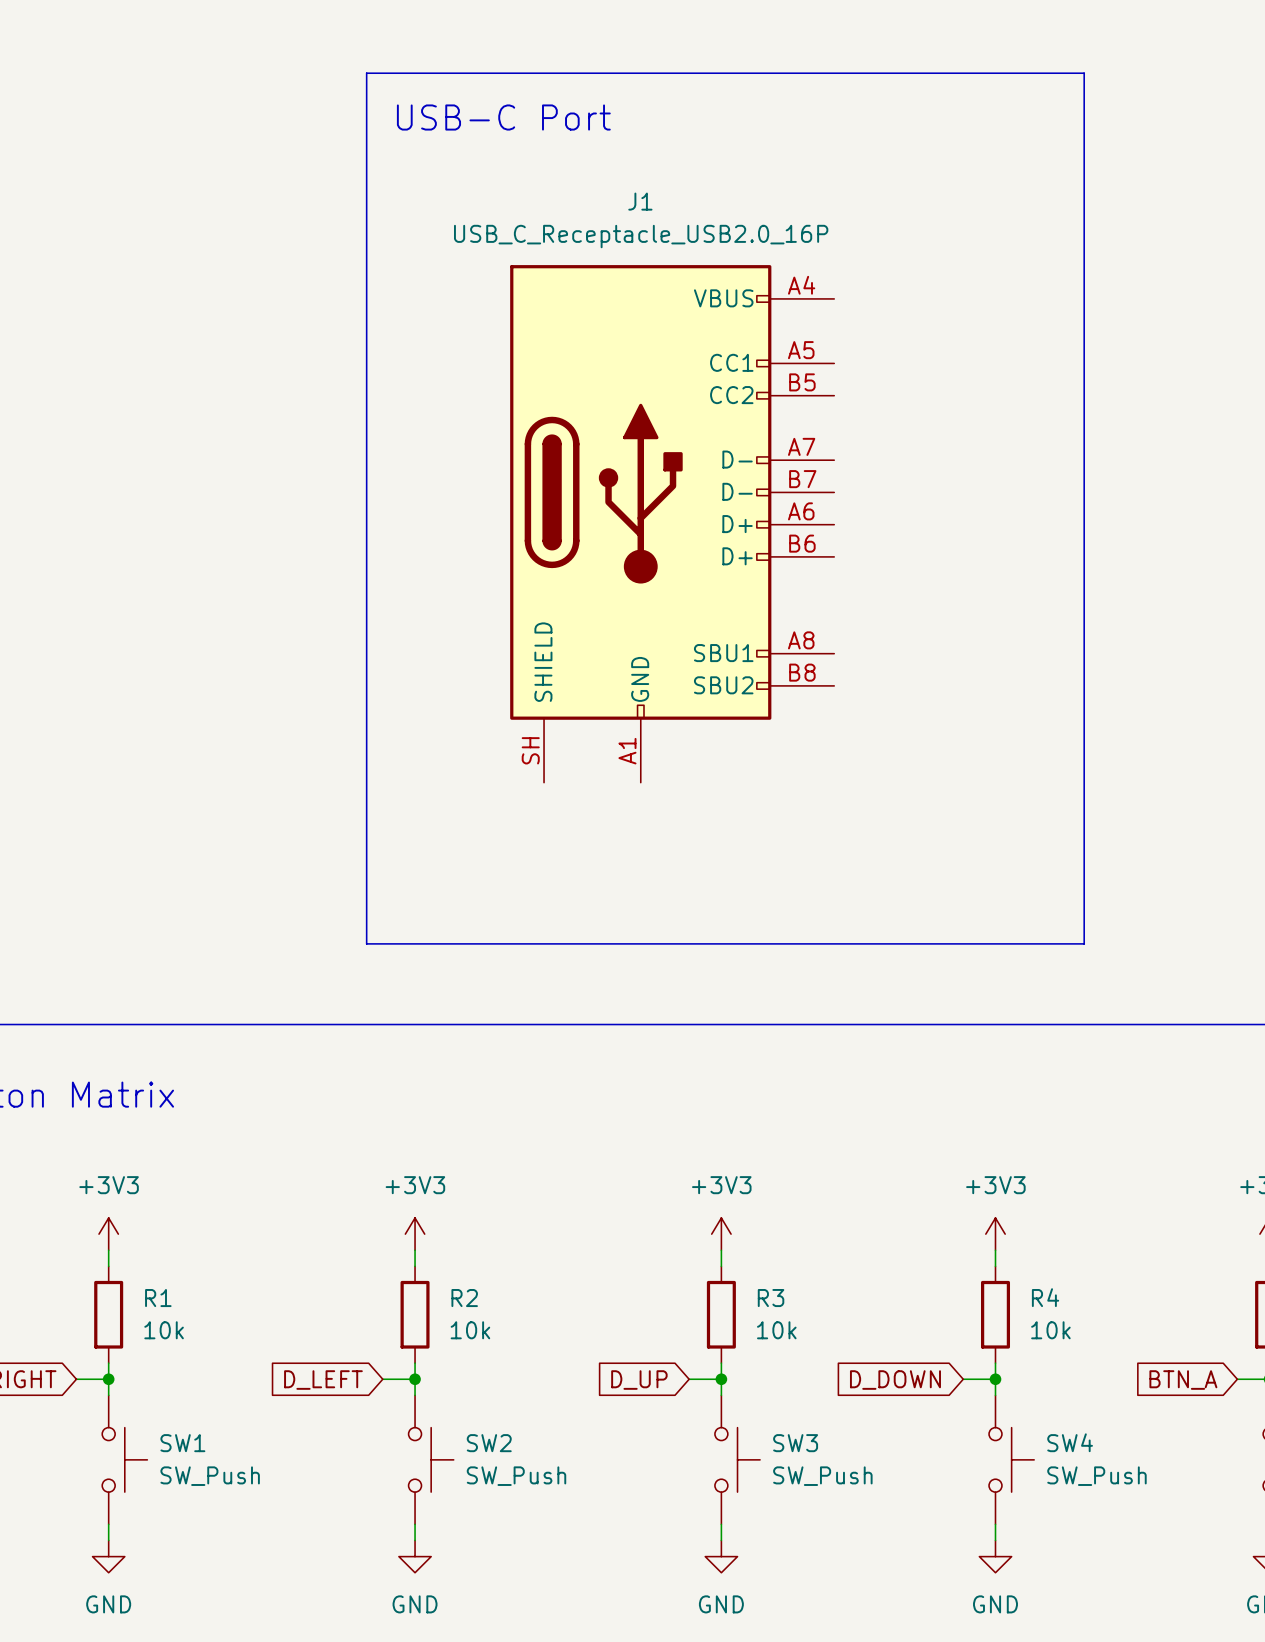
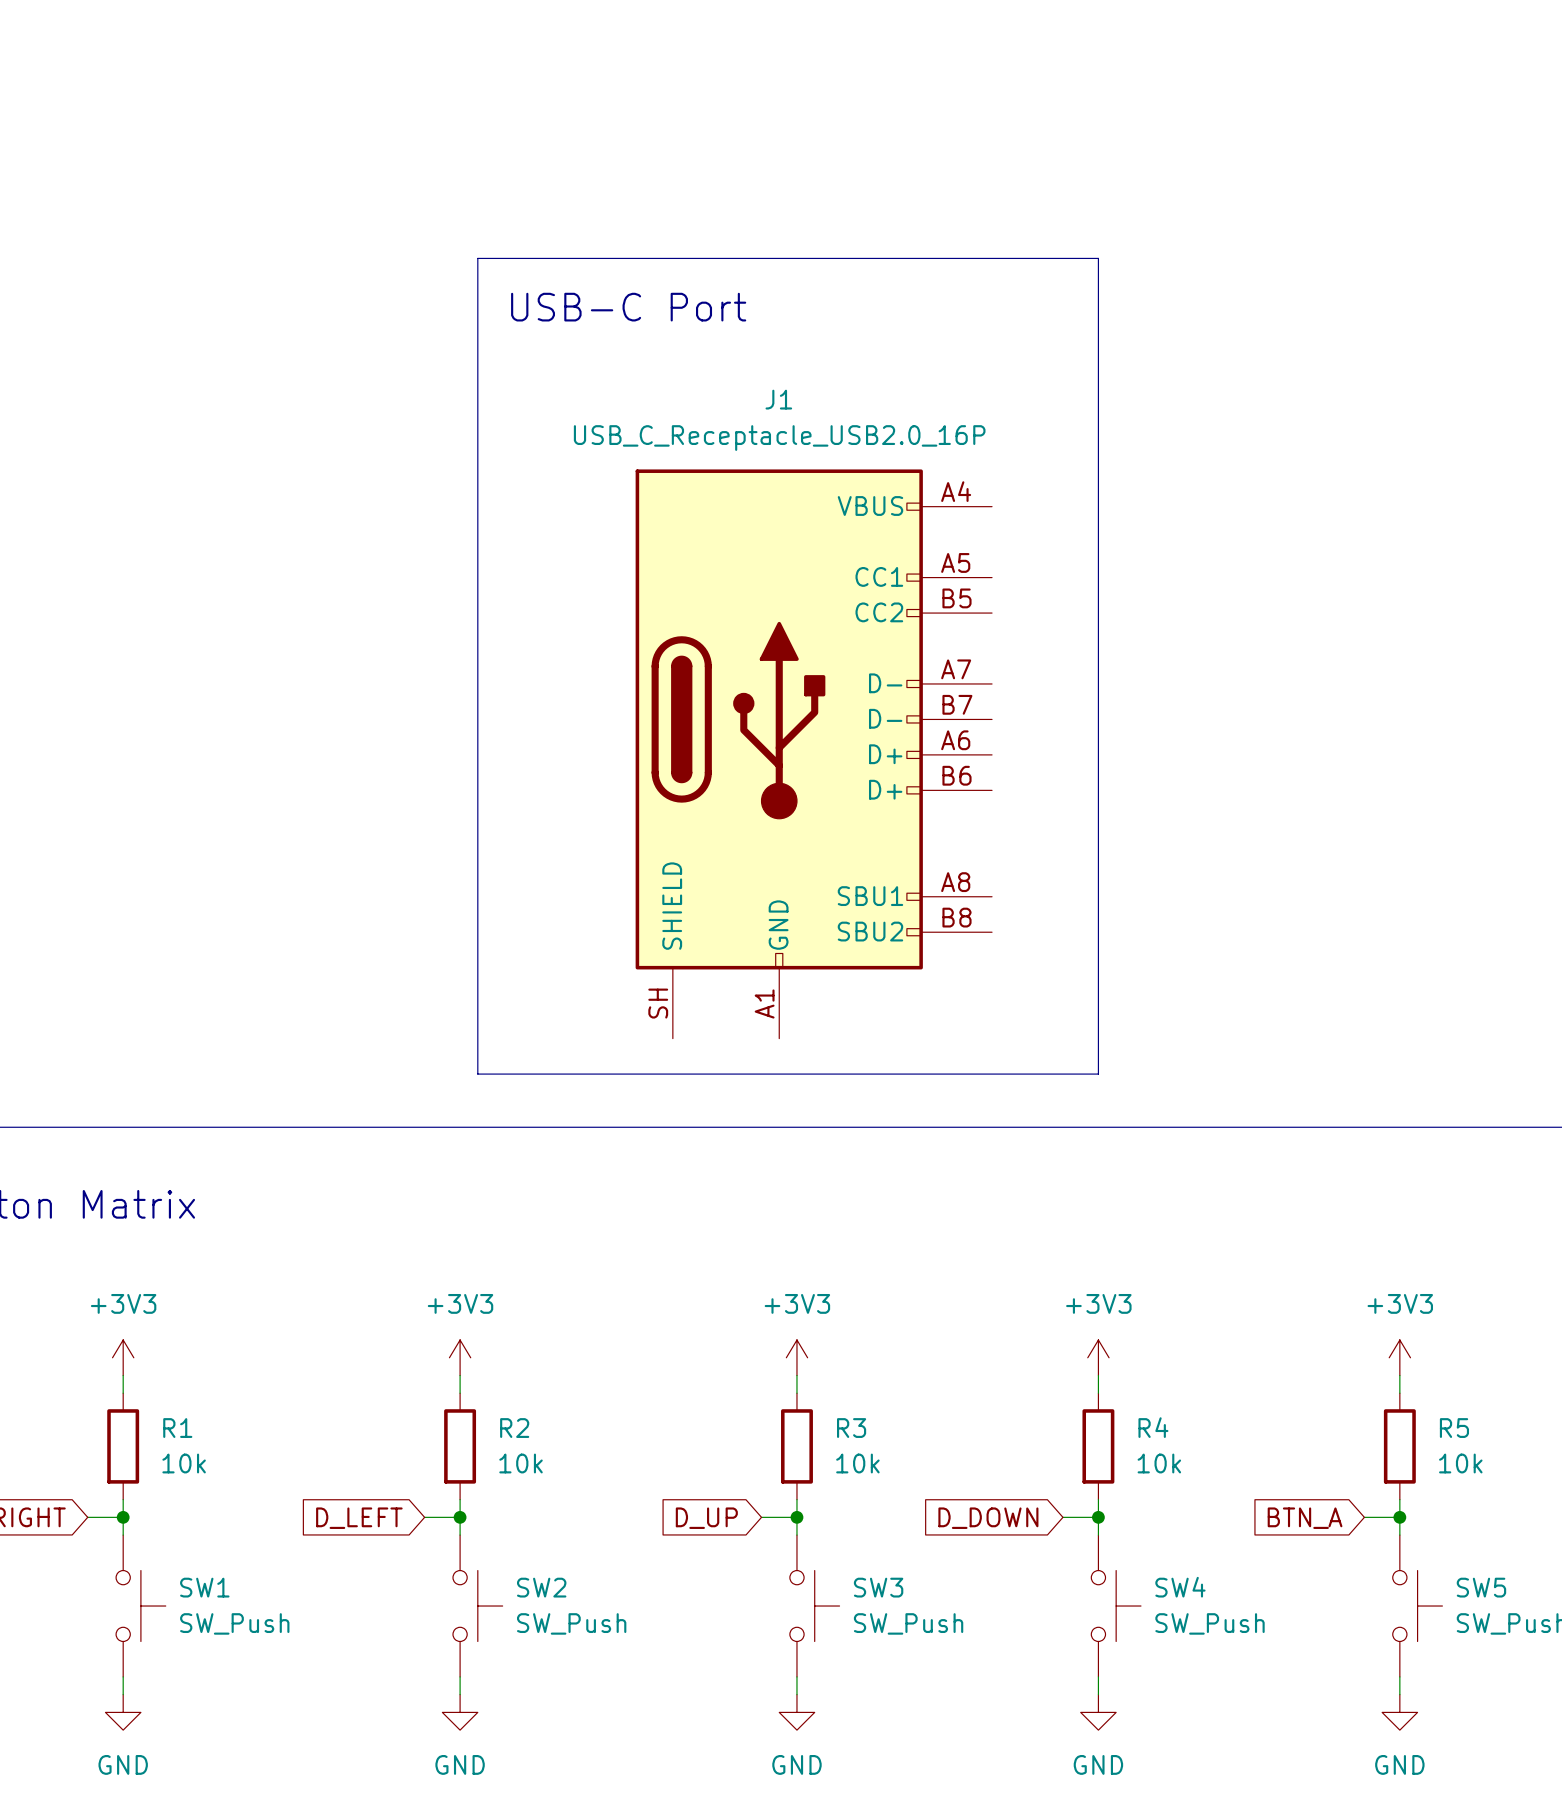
line: (366, 73) (1084, 73) (1084, 943) (366, 943) (366, 73) -> (477, 258) (477, 1074) (1098, 1074) (1098, 258) (477, 258)
text position: USB-C Port (503, 117) -> USB-C Port (628, 307)
J1 position: (672, 523) -> (813, 754)

